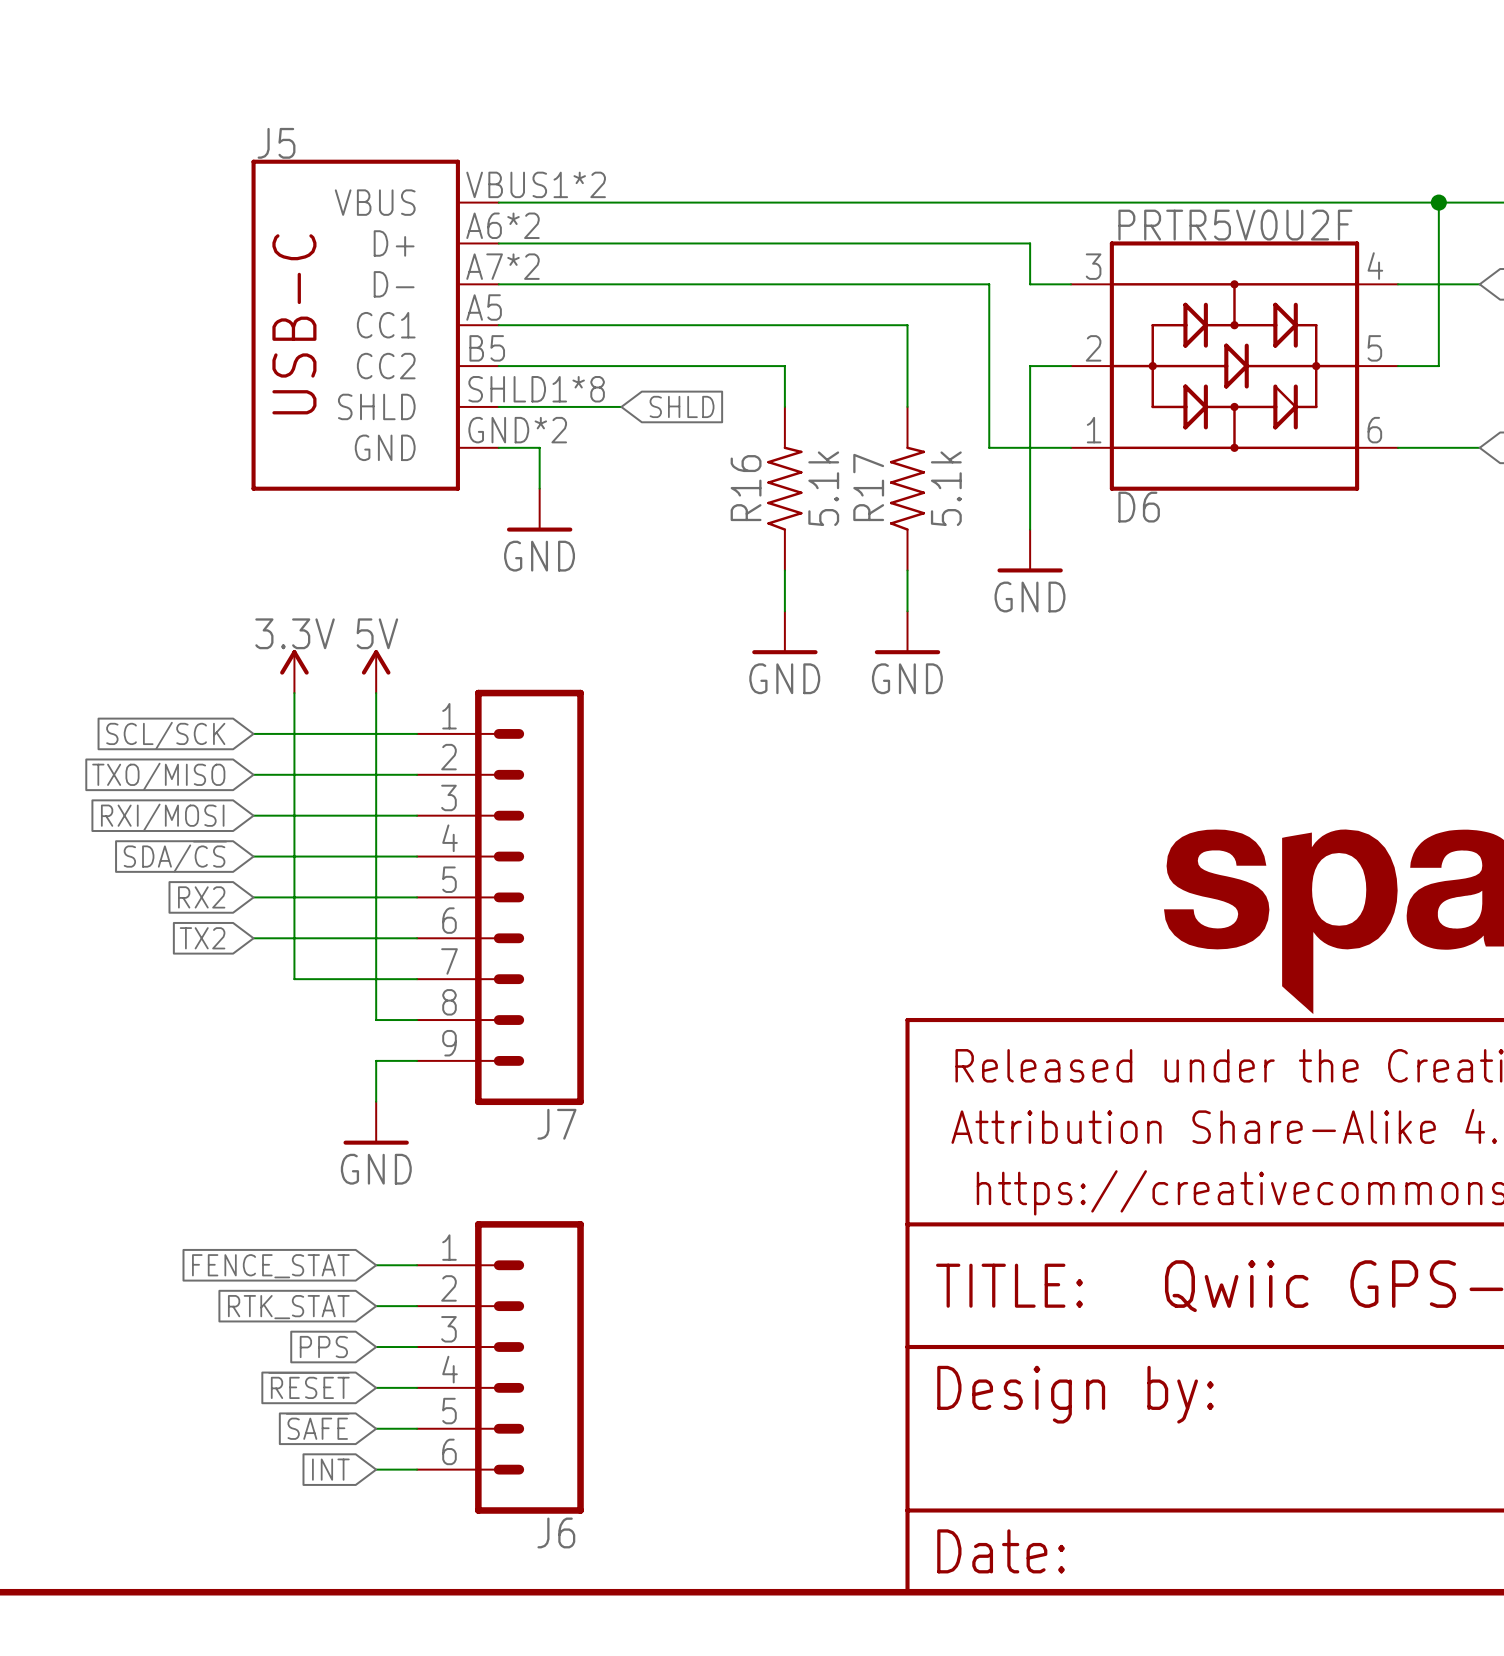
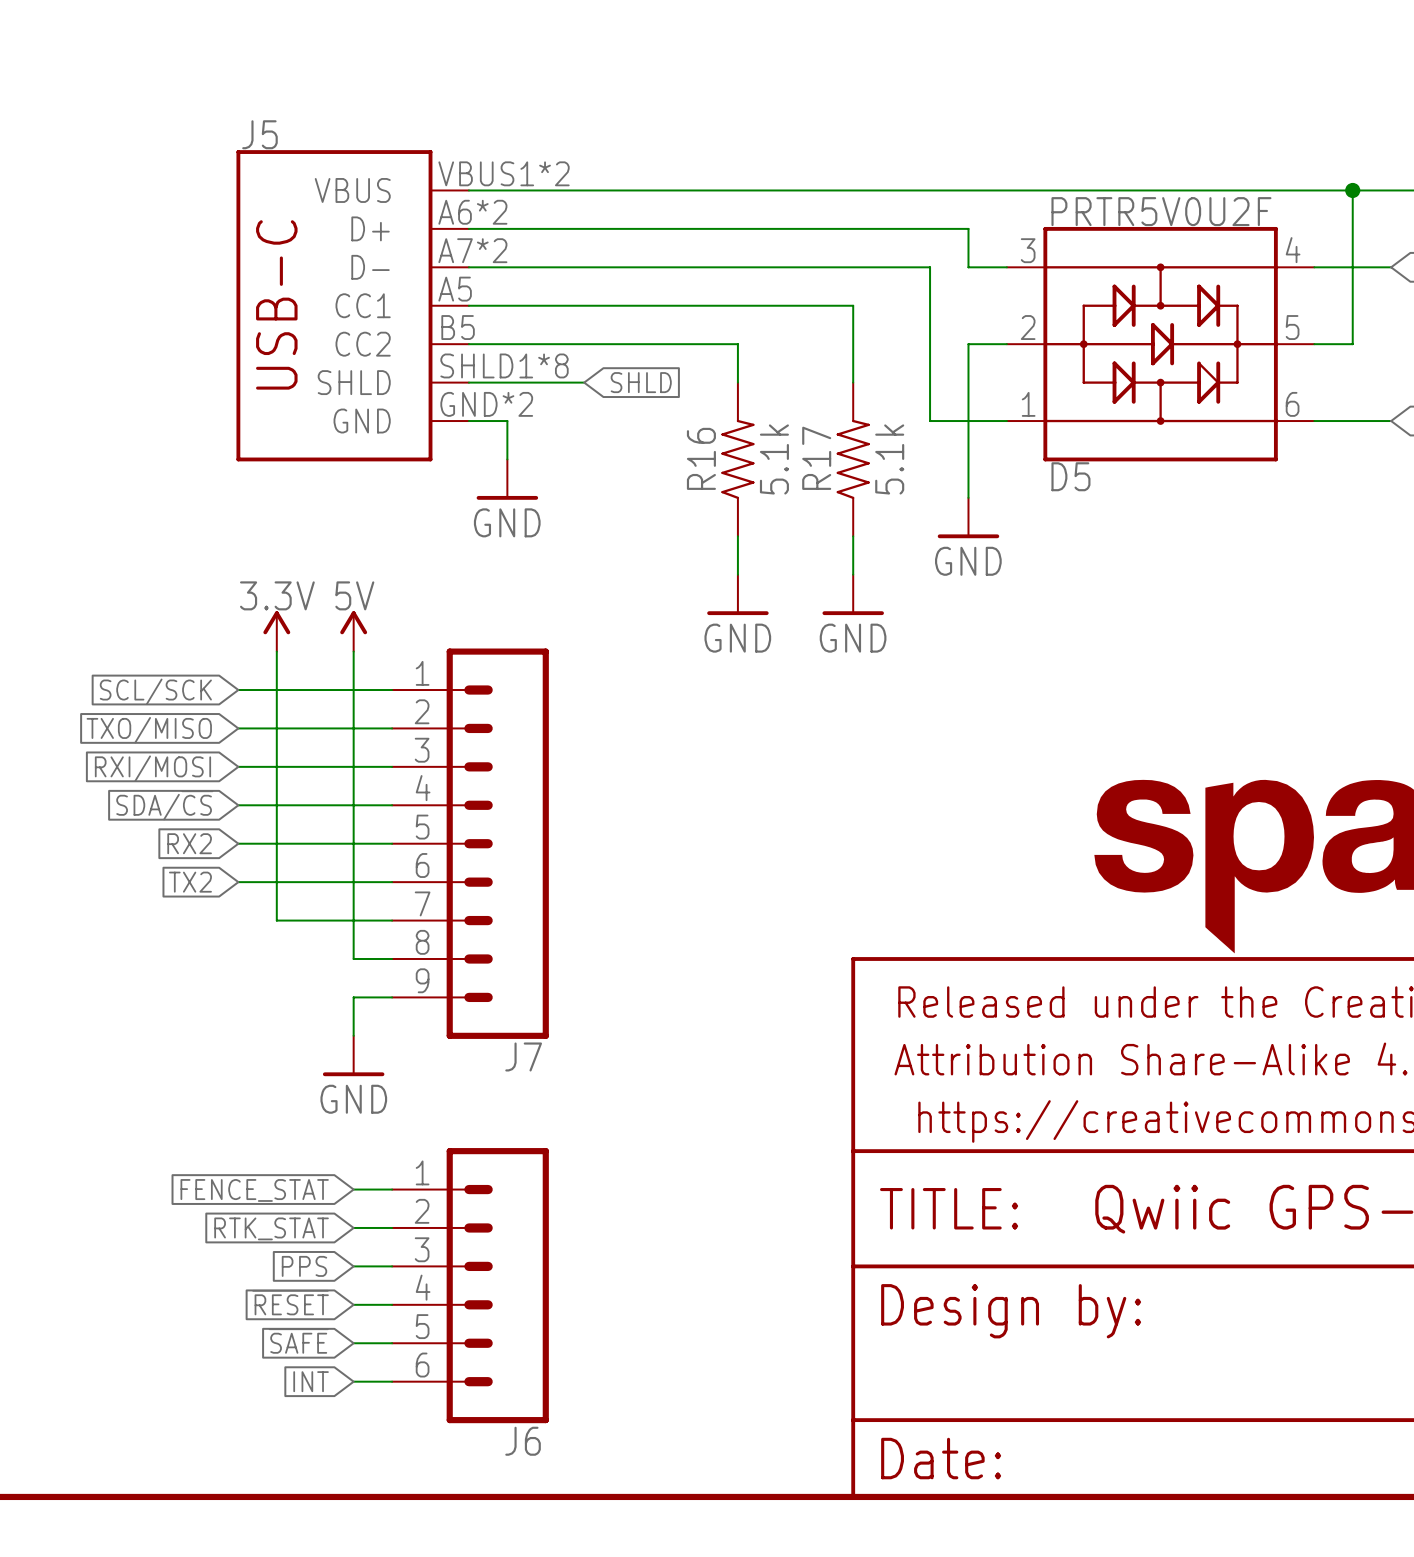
D6 name: D6 (1139, 507) -> D5 (1070, 476)

